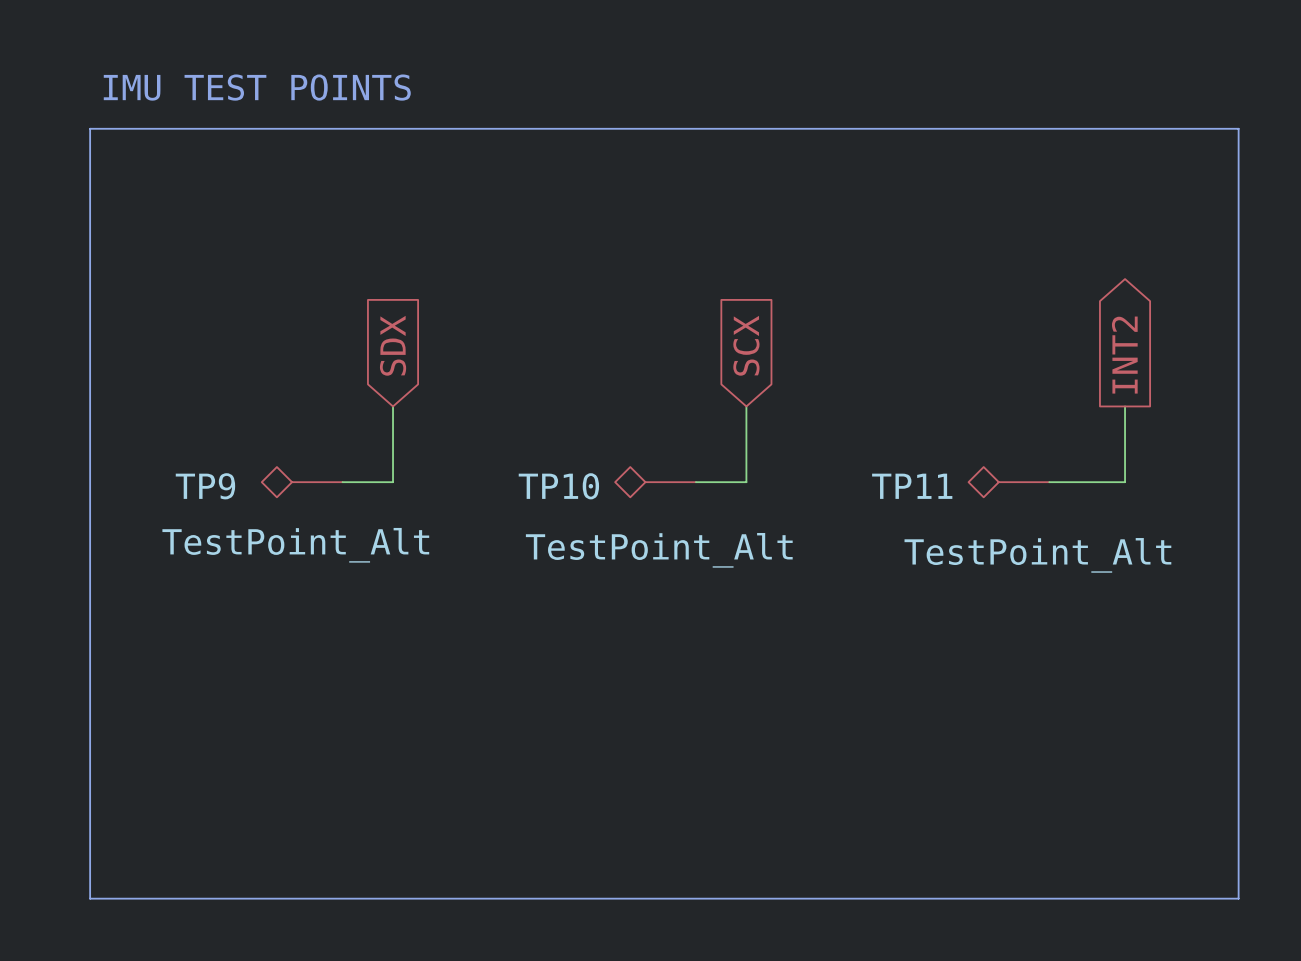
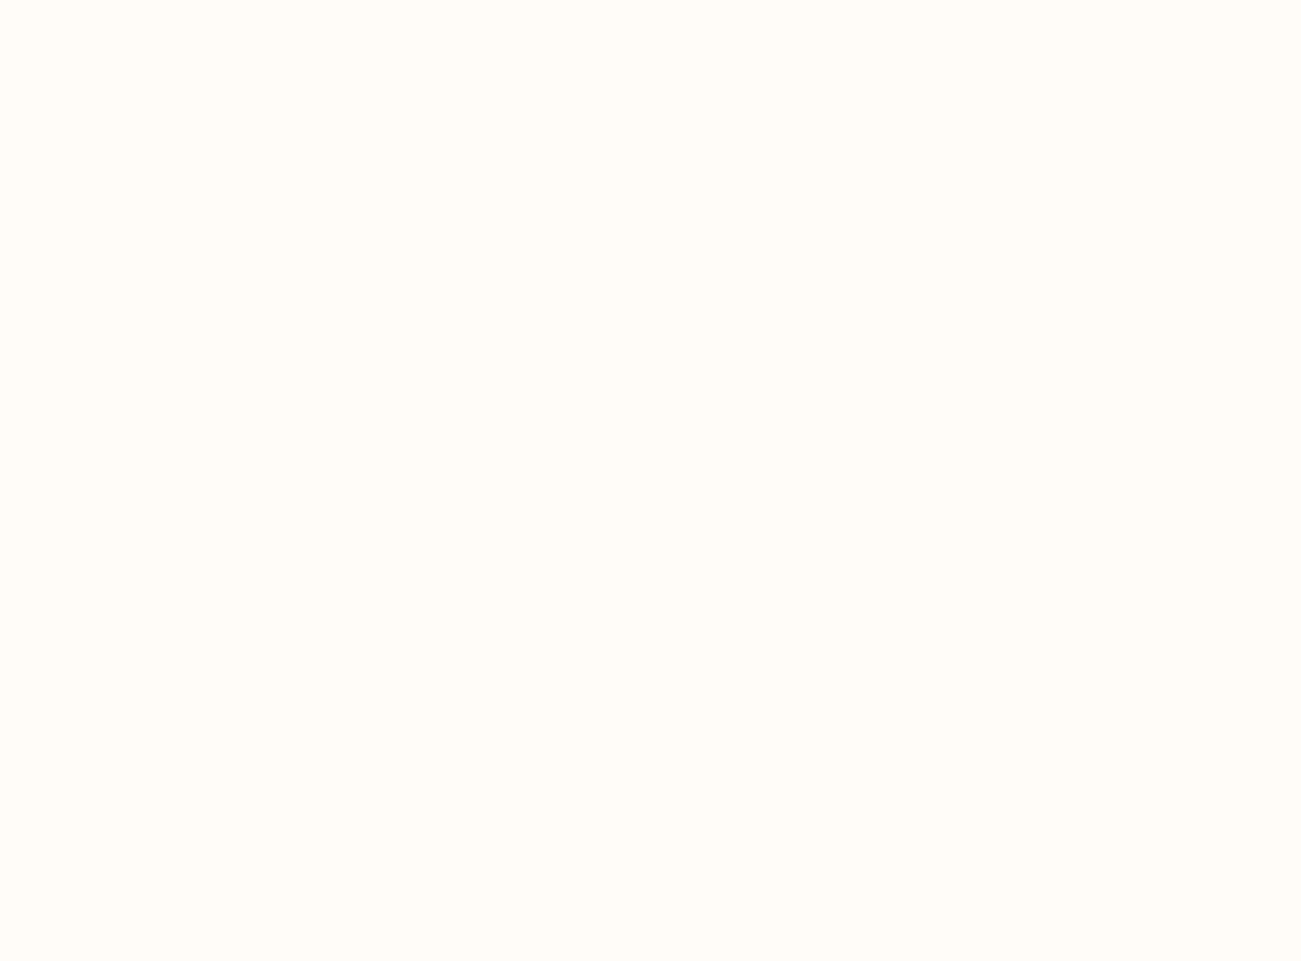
text: IMU TEST POINTS (257, 87) -> none
line: (90, 128) (1238, 128) (1238, 898) (90, 898) (90, 128) -> none
global label: SDX (393, 345) -> none
global label: SCX (746, 345) -> none
global label: INT2 (1124, 355) -> none
wire: (393, 406) (393, 482) (342, 482) -> none
wire: (746, 406) (746, 482) (695, 482) -> none
wire: (1125, 406) (1125, 482) (1049, 482) -> none
TP9: TestPoint_Alt (302, 482) -> none
TP10: TestPoint_Alt (655, 482) -> none
TP11: TestPoint_Alt (1008, 482) -> none

